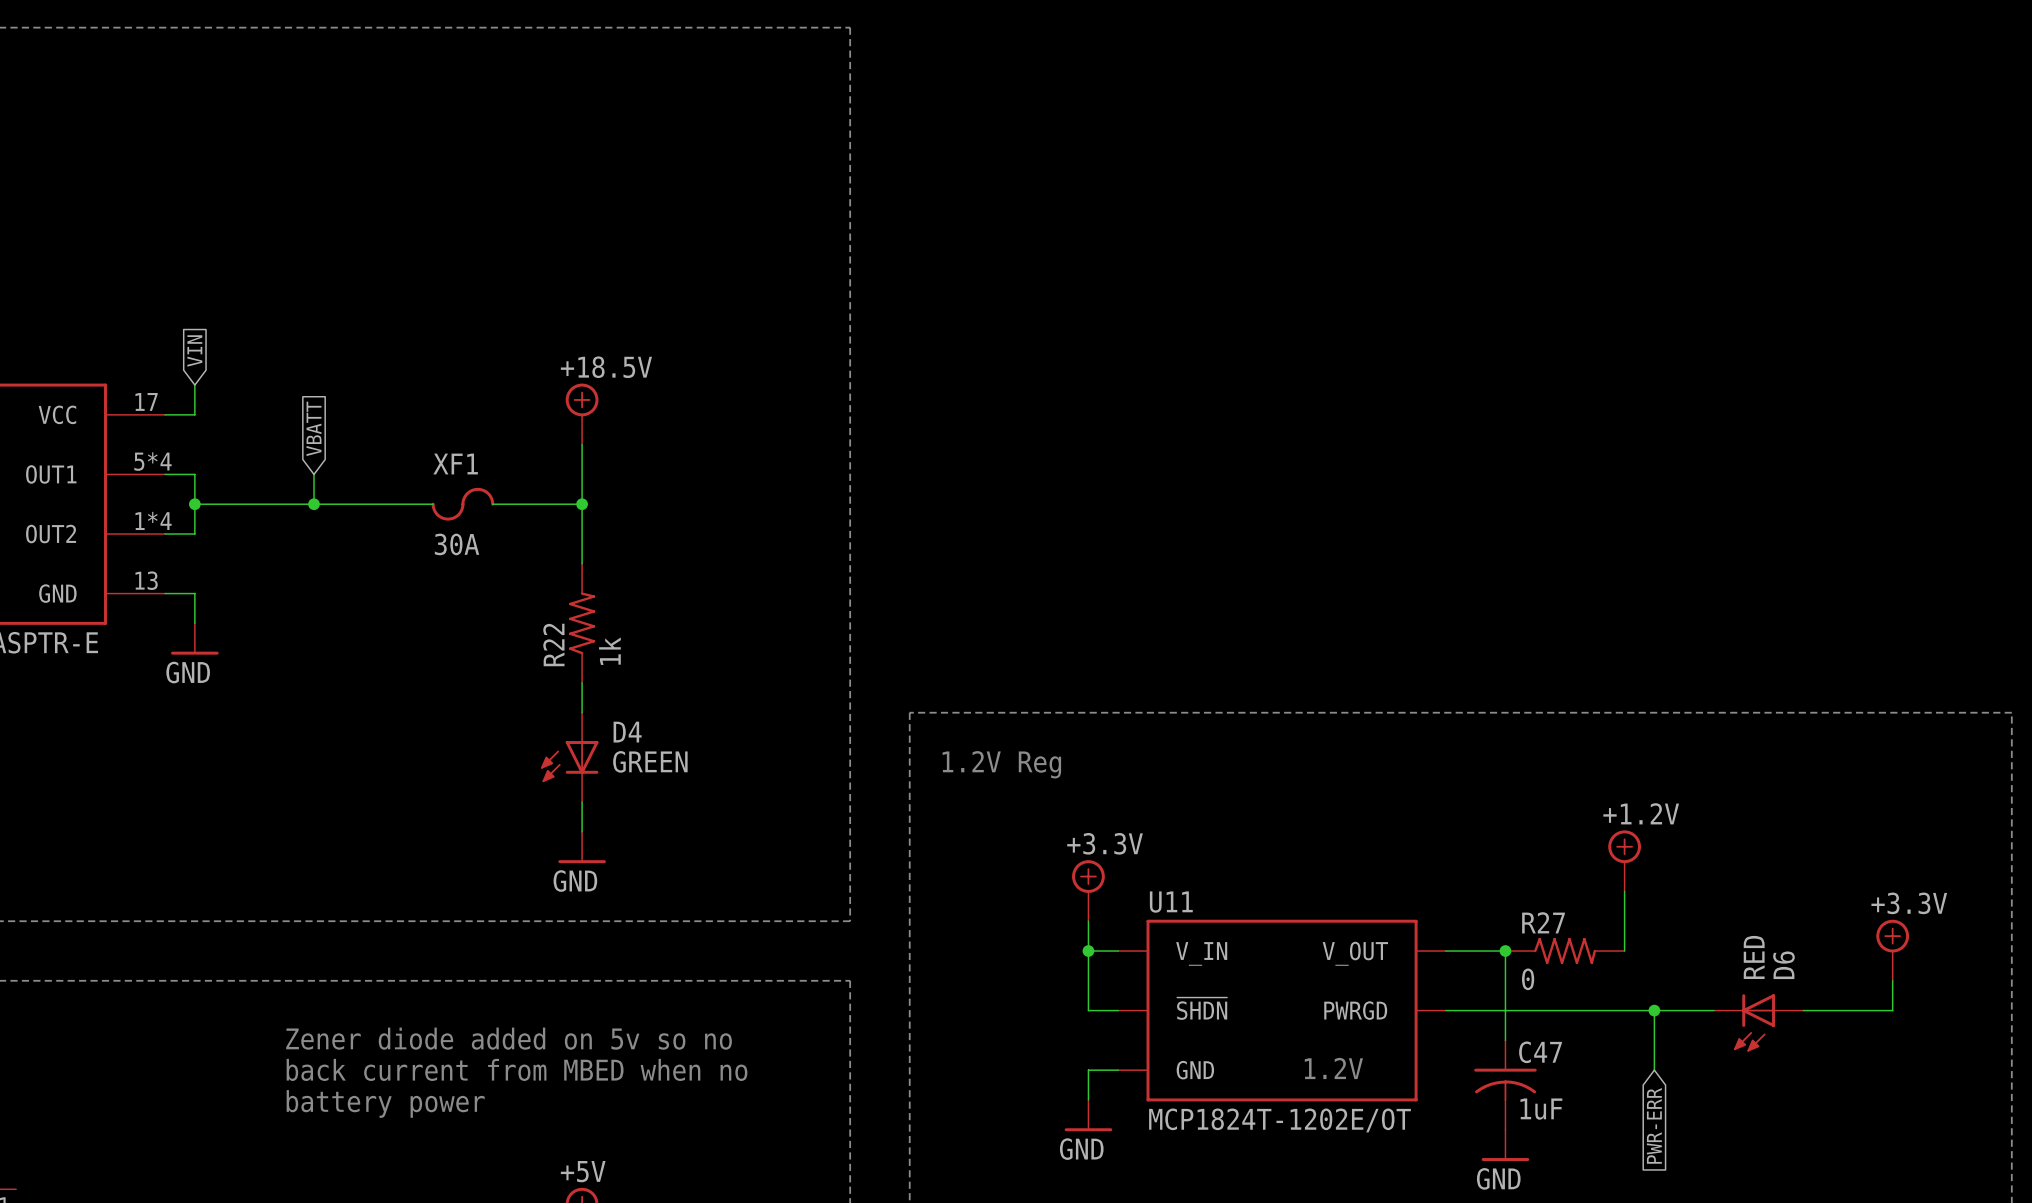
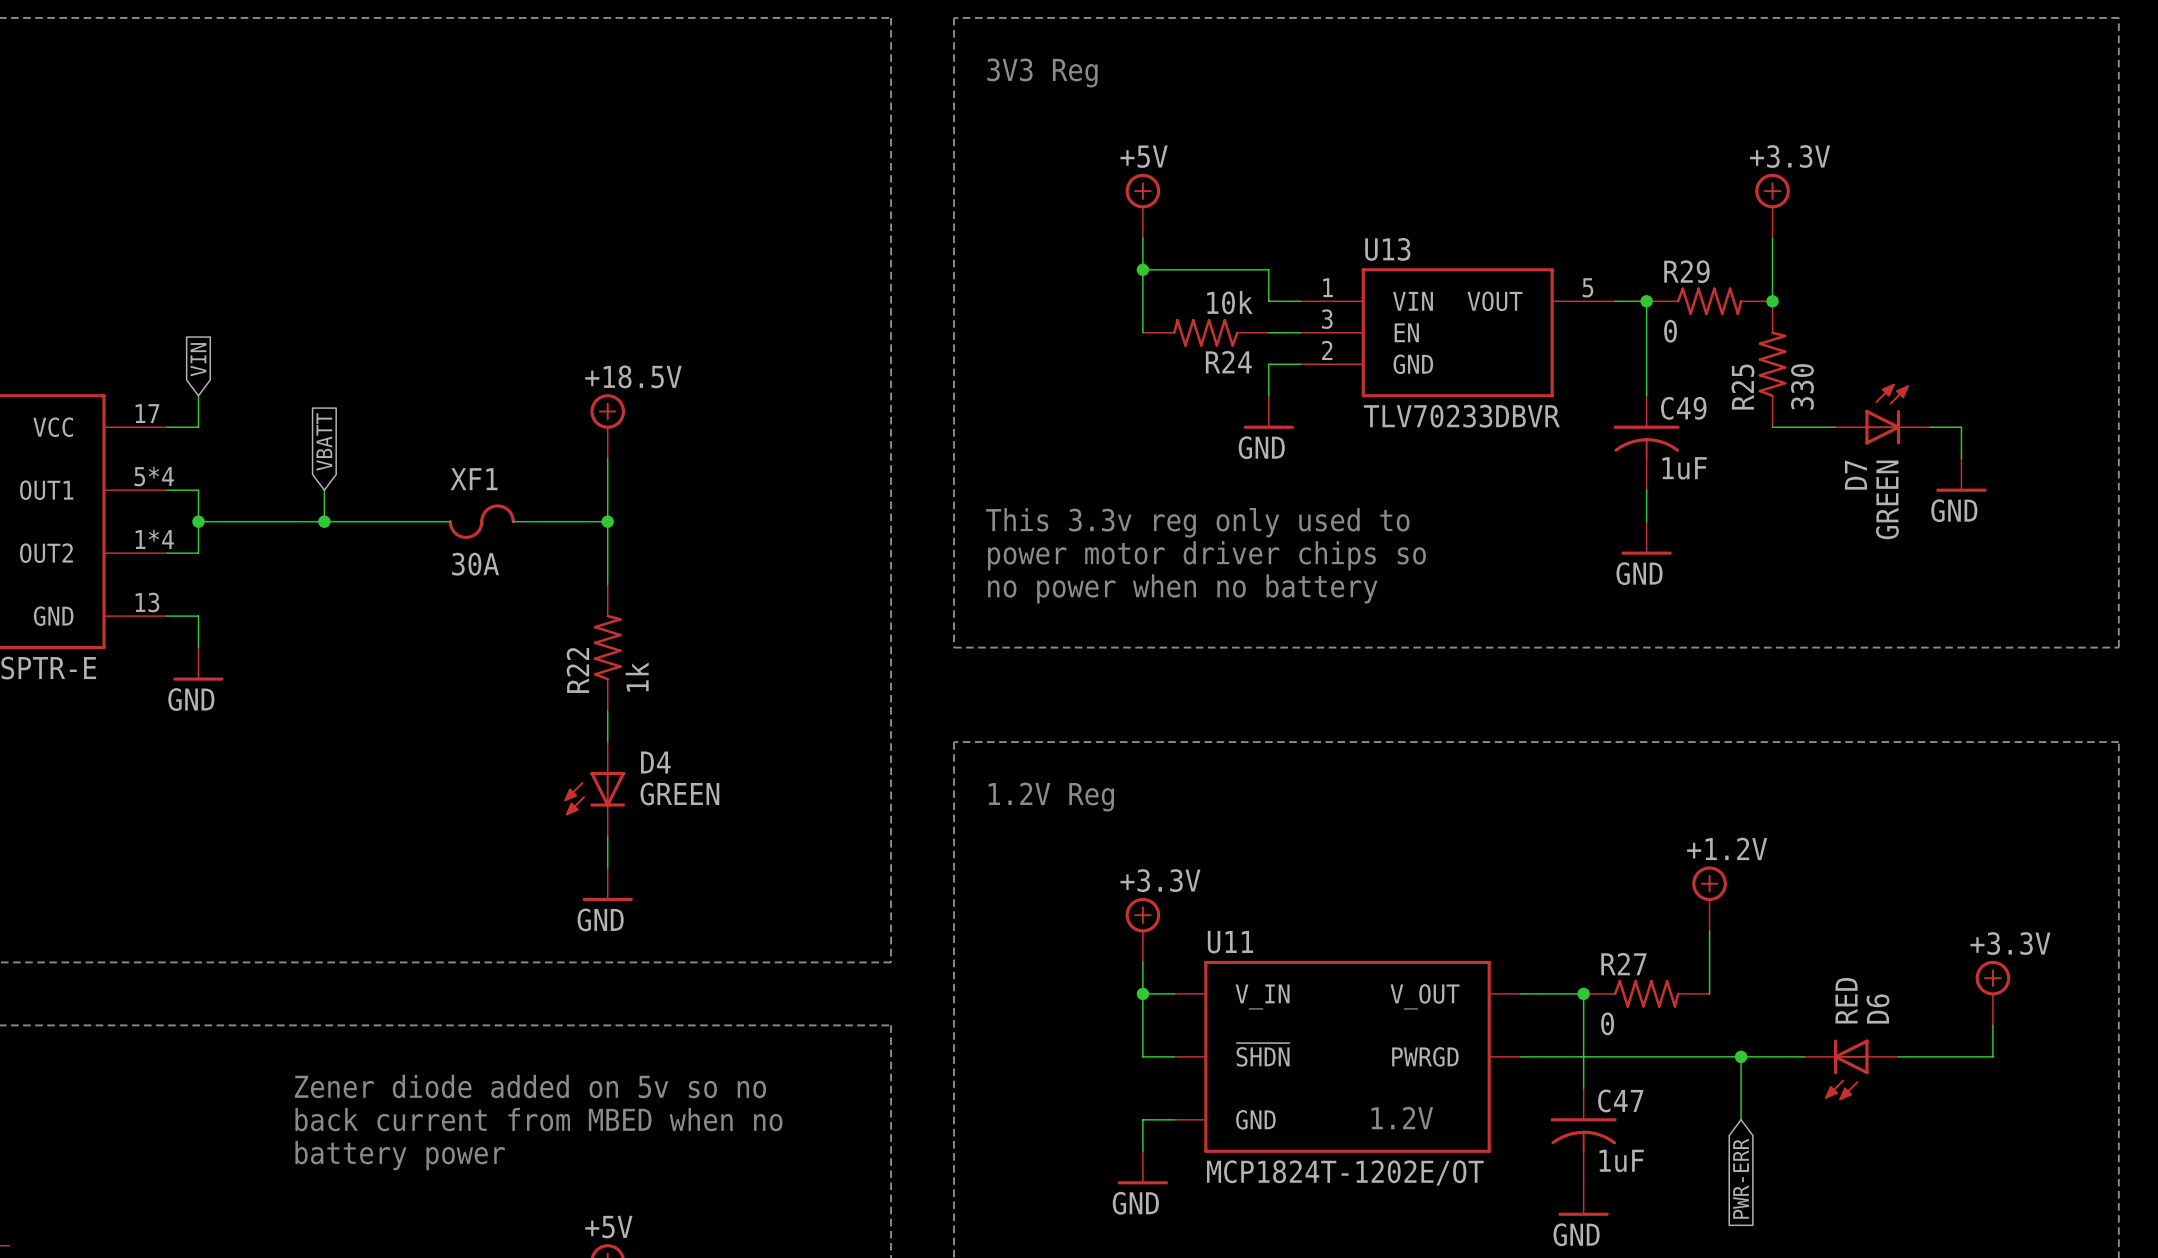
line: none -> (954, 17) (954, 647) (2118, 647) (2118, 17) (954, 17)
text: none -> 3V3 Reg (1042, 72)
power symbol: none -> +5V (1142, 206)
power symbol: none -> +3.3V (1772, 206)
wire: none -> (1142, 238) (1142, 332)
wire: none -> (1772, 238) (1772, 301)
wire: none -> (1142, 269) (1268, 269) (1268, 301) (1300, 301)
junction: none -> (1142, 269)
wire: none -> (1615, 301) (1646, 301) (1646, 395)
junction: none -> (1646, 301)
R29: none -> 0 (1709, 301)
junction: none -> (1772, 301)
R24: none -> 10k (1205, 332)
wire: none -> (1268, 332) (1300, 332)
U13: none -> TLV70233DBVR (1457, 332)
wire: none -> (1300, 364) (1268, 364) (1268, 395)
R25: none -> 330 (1772, 364)
power symbol: none -> GND (1268, 412)
D7: none -> GREEN (1882, 414)
wire: none -> (1772, 427) (1835, 427)
wire: none -> (1929, 427) (1961, 427) (1961, 458)
C49: none -> 1uF (1646, 442)
power symbol: none -> GND (1961, 475)
wire: none -> (1646, 490) (1646, 521)
text: none -> This 3.3v reg only used to (1197, 522)
power symbol: none -> GND (1646, 538)
text: none -> power motor driver chips so (1206, 555)
text: none -> no power when no battery (1182, 588)

